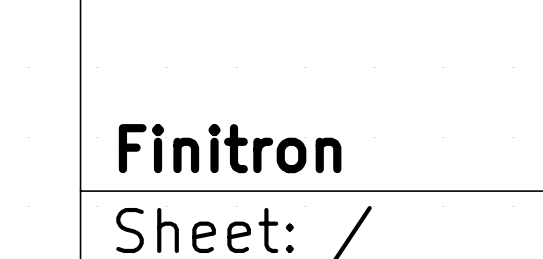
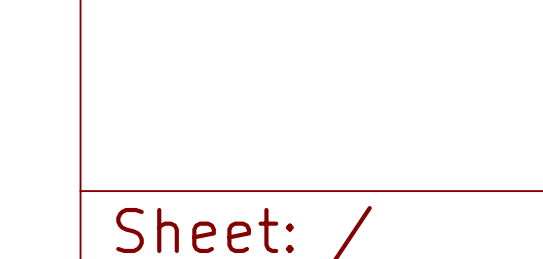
title block: Finitron (230, 148) -> none

